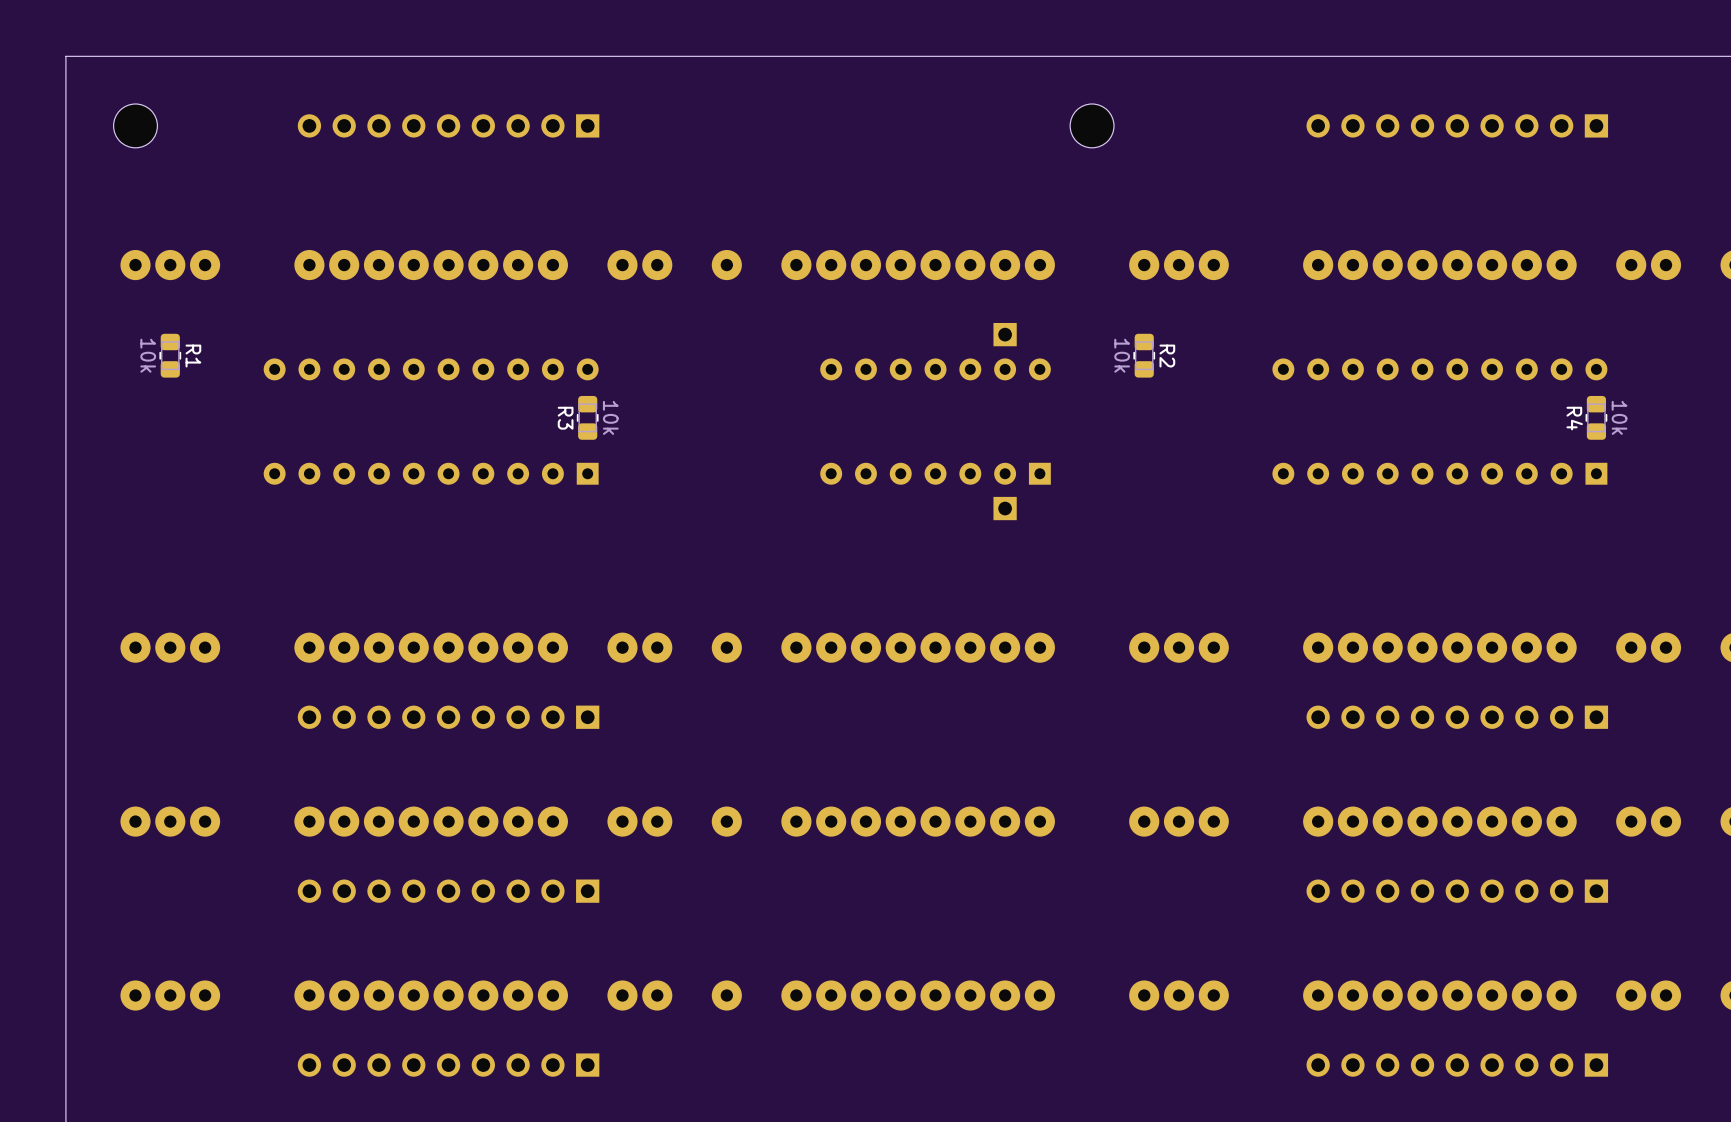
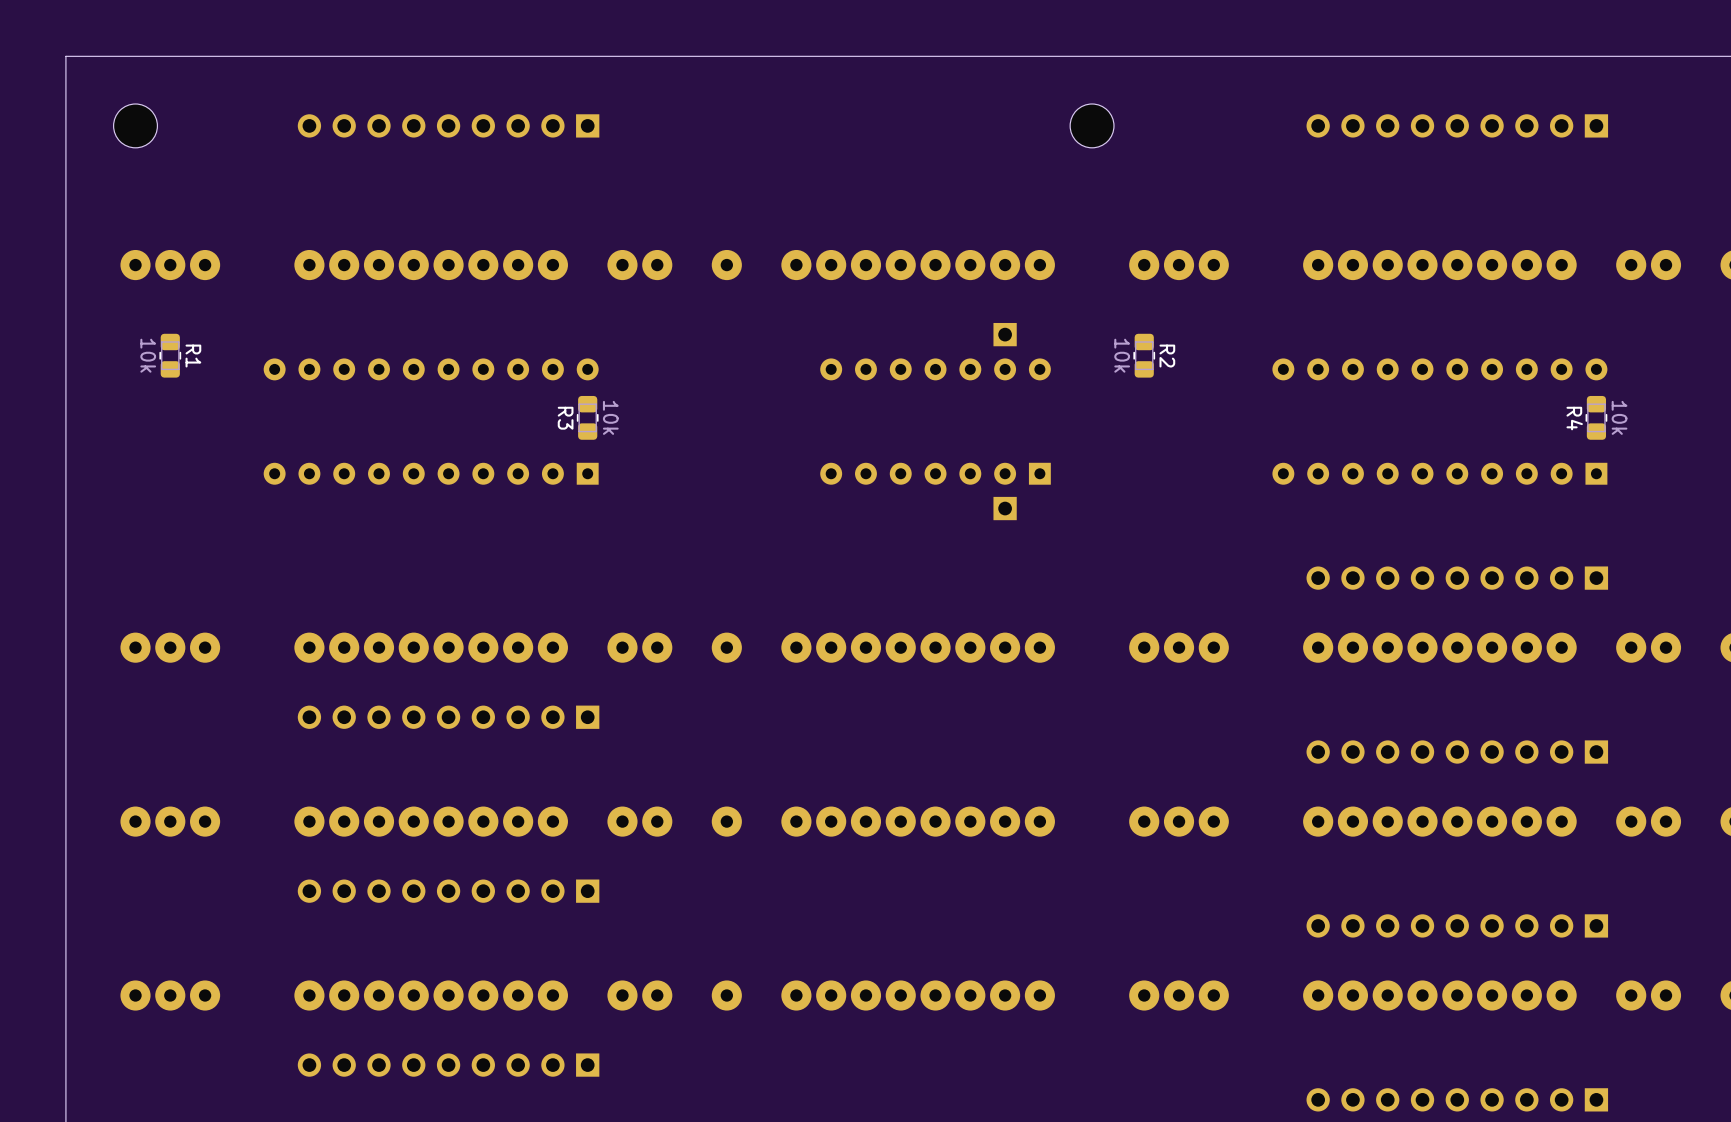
part: none -> (1457, 578)
part position: (1457, 717) -> (1457, 752)
part position: (1457, 891) -> (1457, 925)
part position: (1457, 1065) -> (1457, 1099)

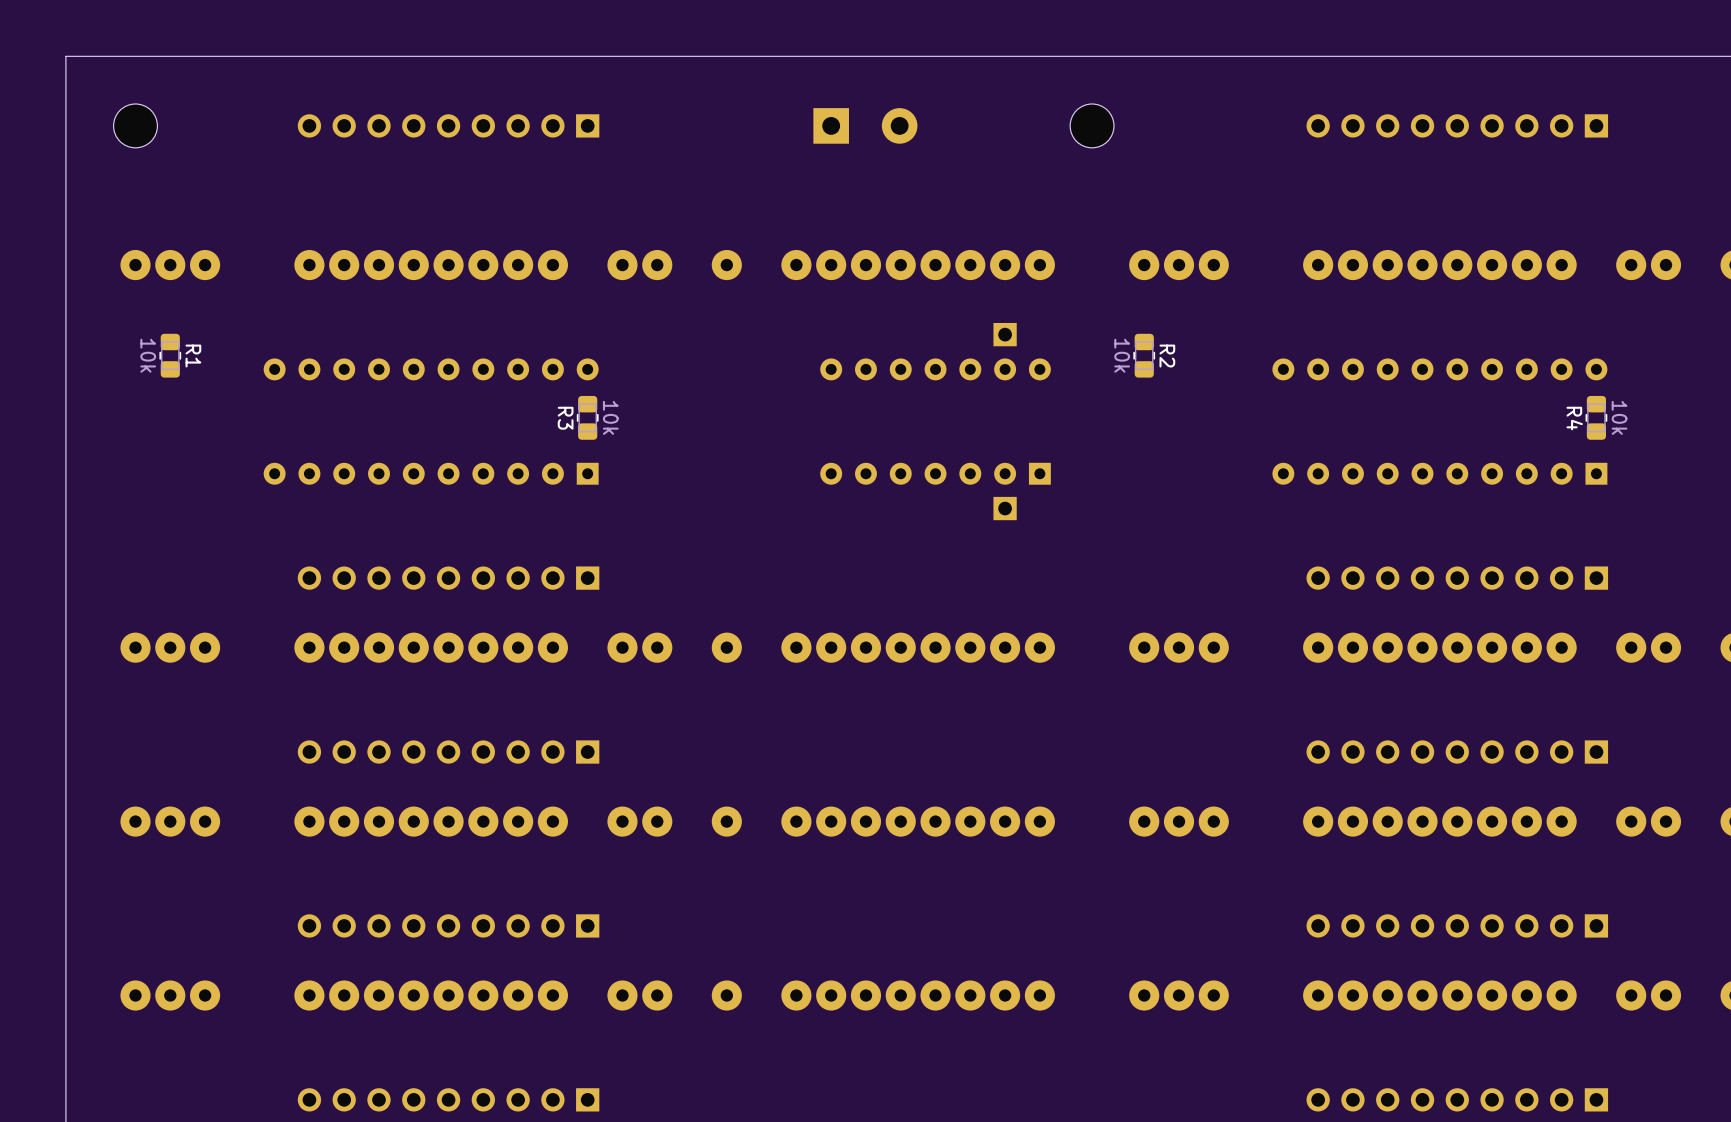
part: none -> (865, 125)
part: none -> (448, 578)
part position: (448, 717) -> (448, 752)
part position: (448, 891) -> (448, 925)
part position: (448, 1065) -> (448, 1099)

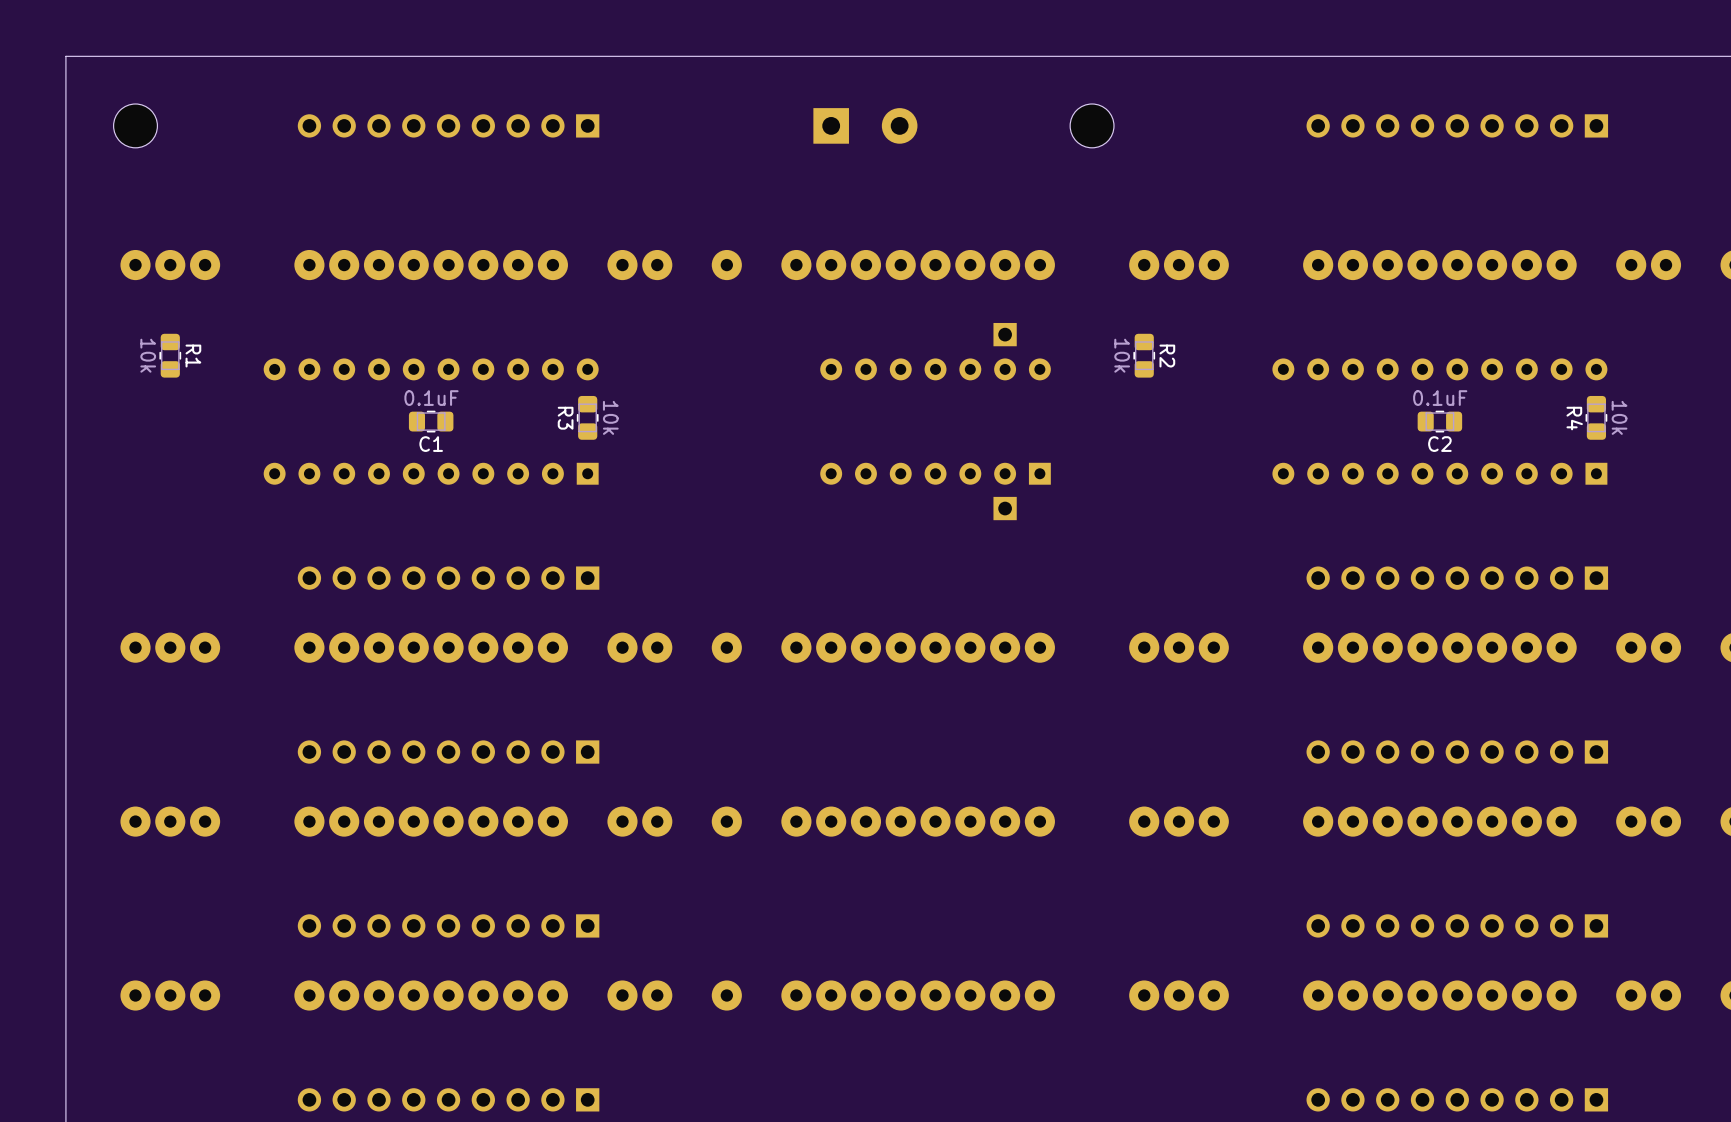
C1: none -> 0.1uF (431, 421)
C2: none -> 0.1uF (1439, 421)

